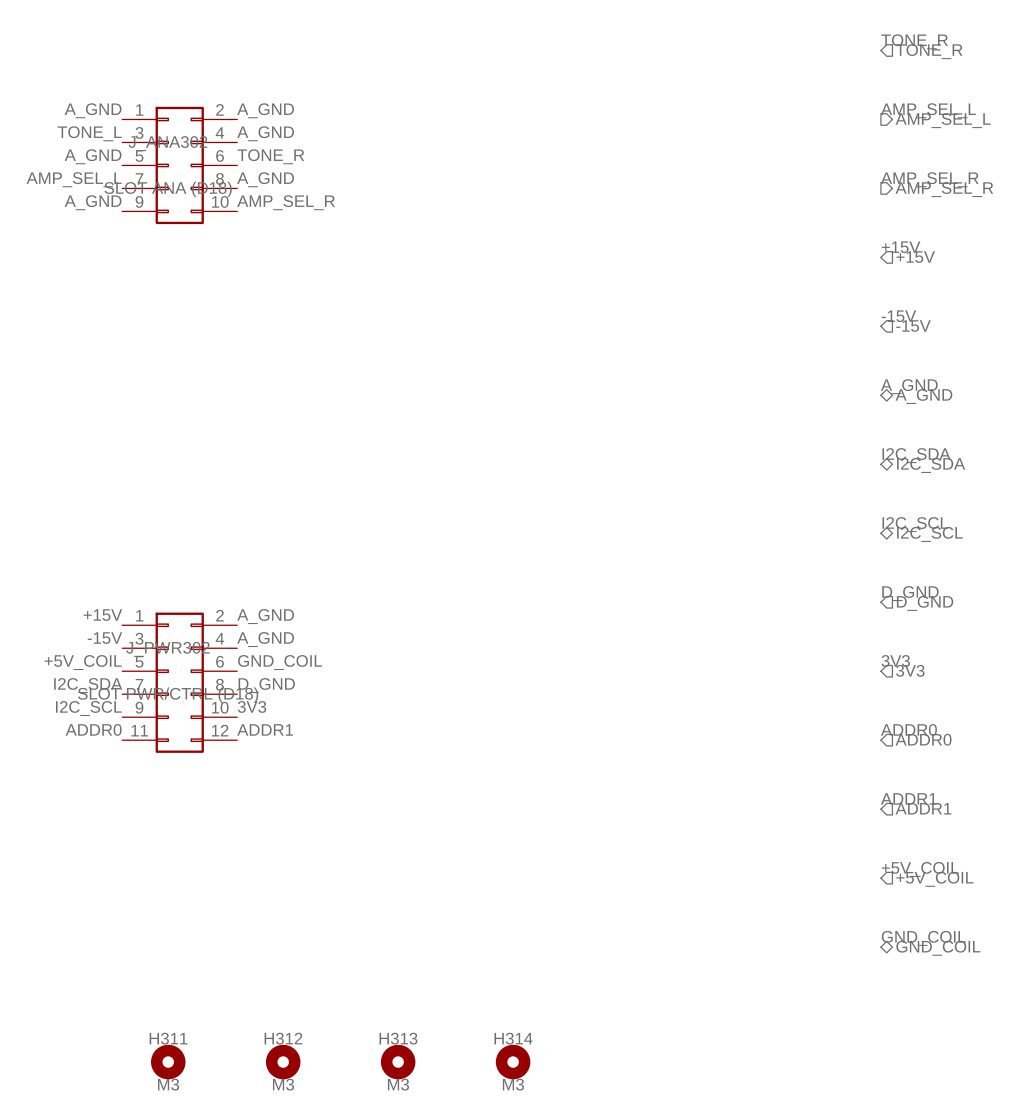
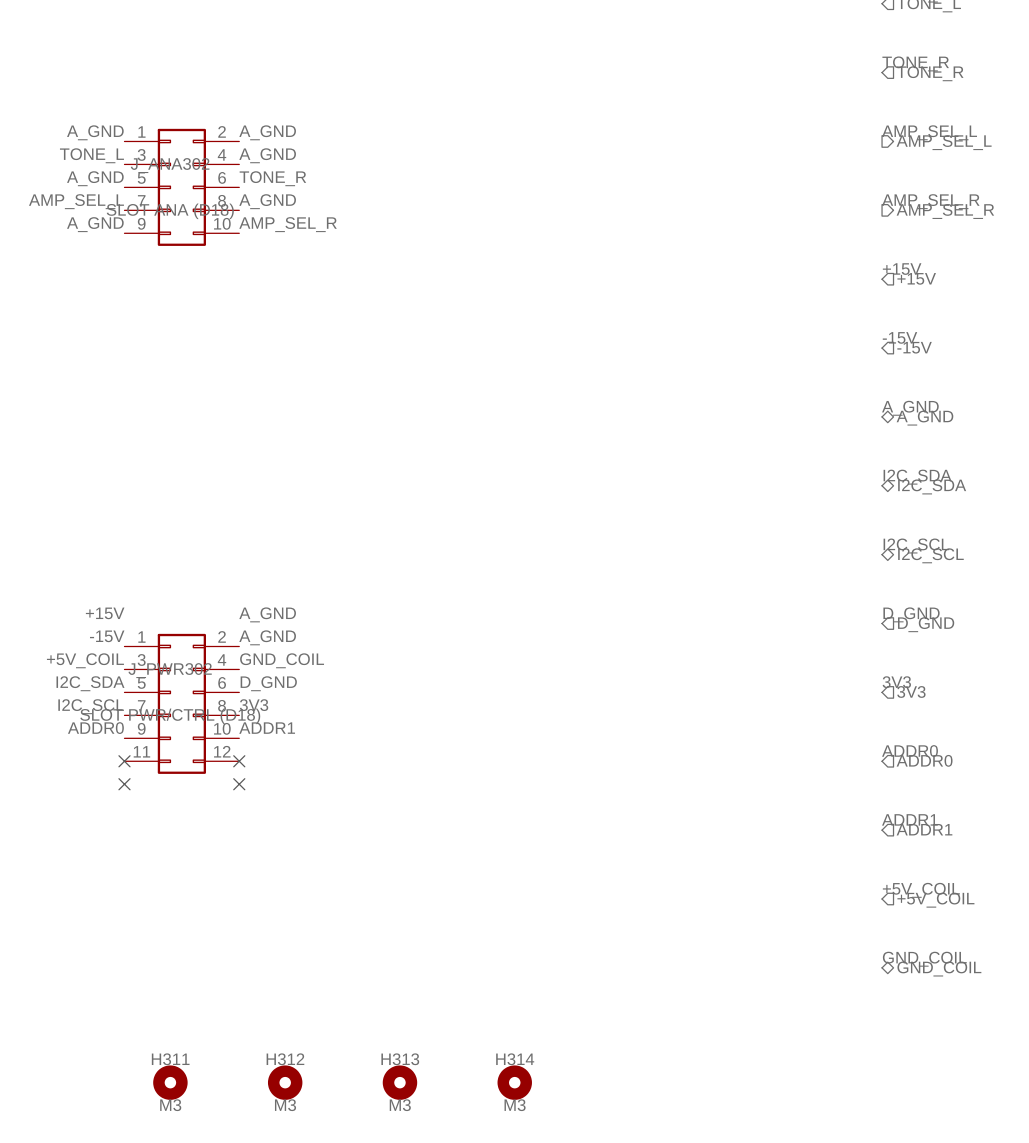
label: none -> +15V (105, 613)
label: none -> A_GND (267, 614)
label: +15V (102, 615) -> -15V (107, 636)
label: -15V (104, 638) -> +5V_COIL (85, 660)
label: A_GND (265, 639) -> GND_COIL (282, 660)
label: +5V_COIL (83, 662) -> I2C_SDA (90, 683)
label: GND_COIL (280, 662) -> D_GND (268, 683)
label: I2C_SDA (88, 685) -> I2C_SCL (91, 706)
label: D_GND (266, 685) -> 3V3 (254, 705)
label: 3V3 (252, 706) -> ADDR1 (267, 728)
label: I2C_SCL (88, 708) -> ADDR0 (95, 728)
label: ADDR0 (93, 729) -> none
label: ADDR1 (265, 729) -> none
no-connect mark: none -> (124, 761)
no-connect mark: none -> (239, 761)
no-connect mark: none -> (124, 784)
no-connect mark: none -> (239, 784)

